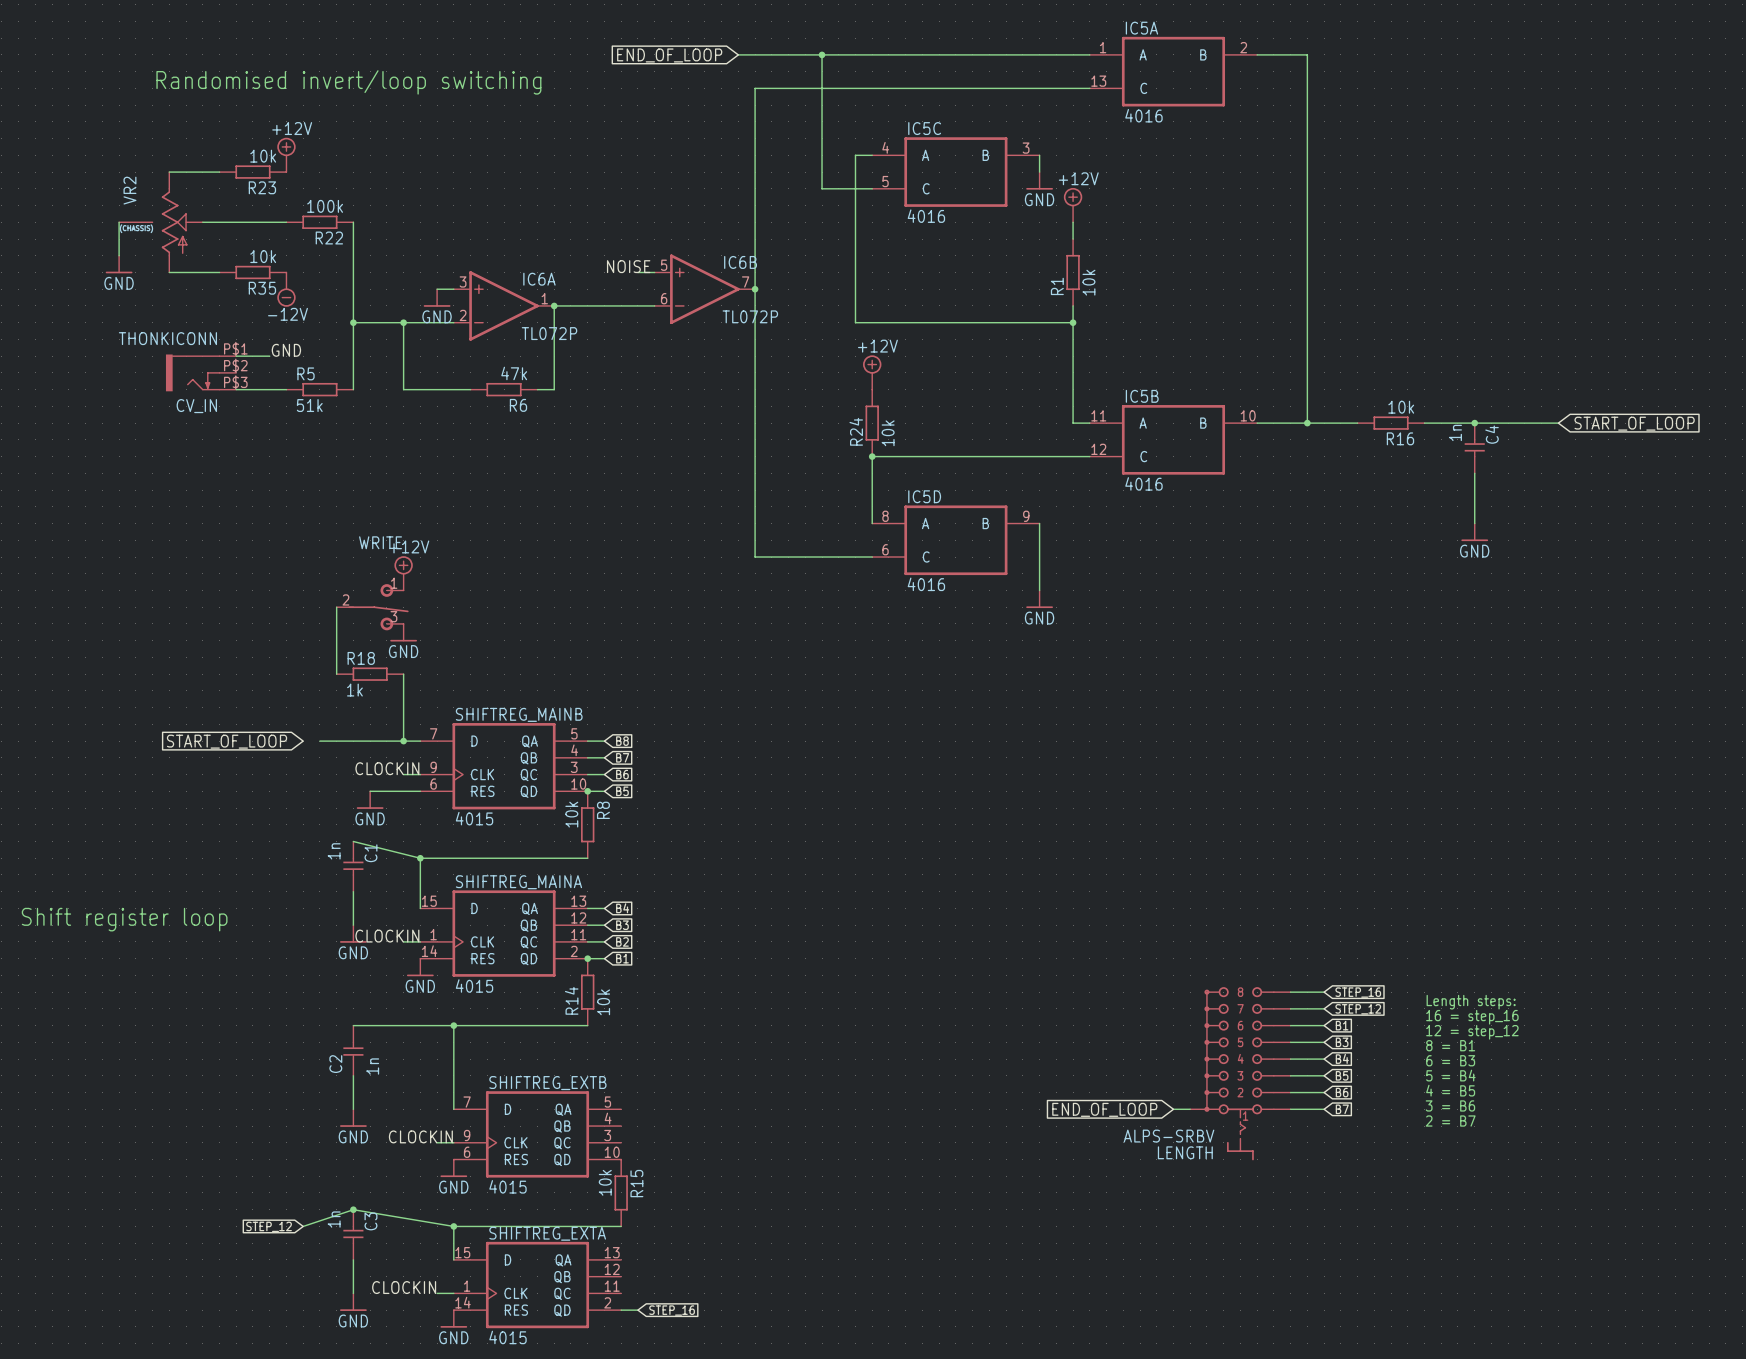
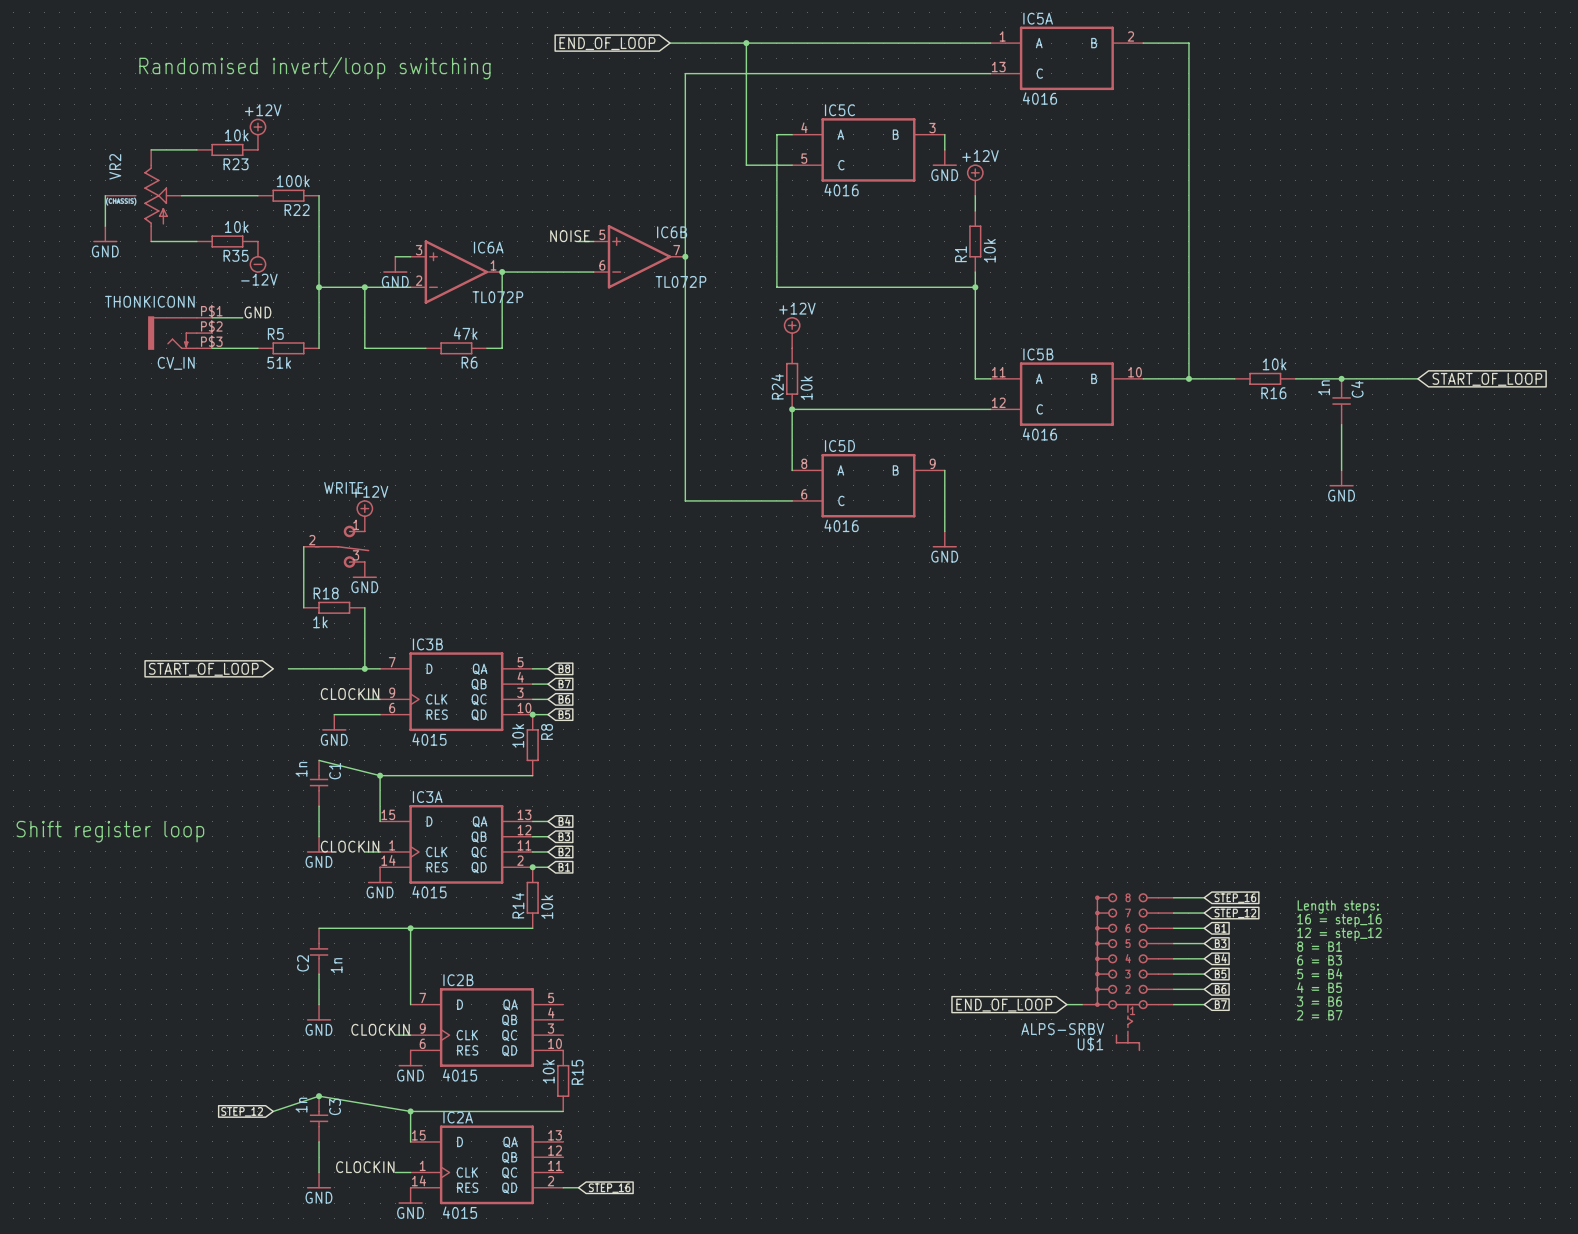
SHIFTREG_MAINB name: SHIFTREG_MAINB (519, 714) -> IC3B (427, 644)
SHIFTREG_MAINA name: SHIFTREG_MAINA (518, 882) -> IC3A (427, 797)
SHIFTREG_EXTB name: SHIFTREG_EXTB (547, 1083) -> IC2B (458, 980)
LENGTH name: LENGTH (1185, 1152) -> U$1 (1090, 1044)
SHIFTREG_EXTA name: SHIFTREG_EXTA (547, 1233) -> IC2A (458, 1117)

